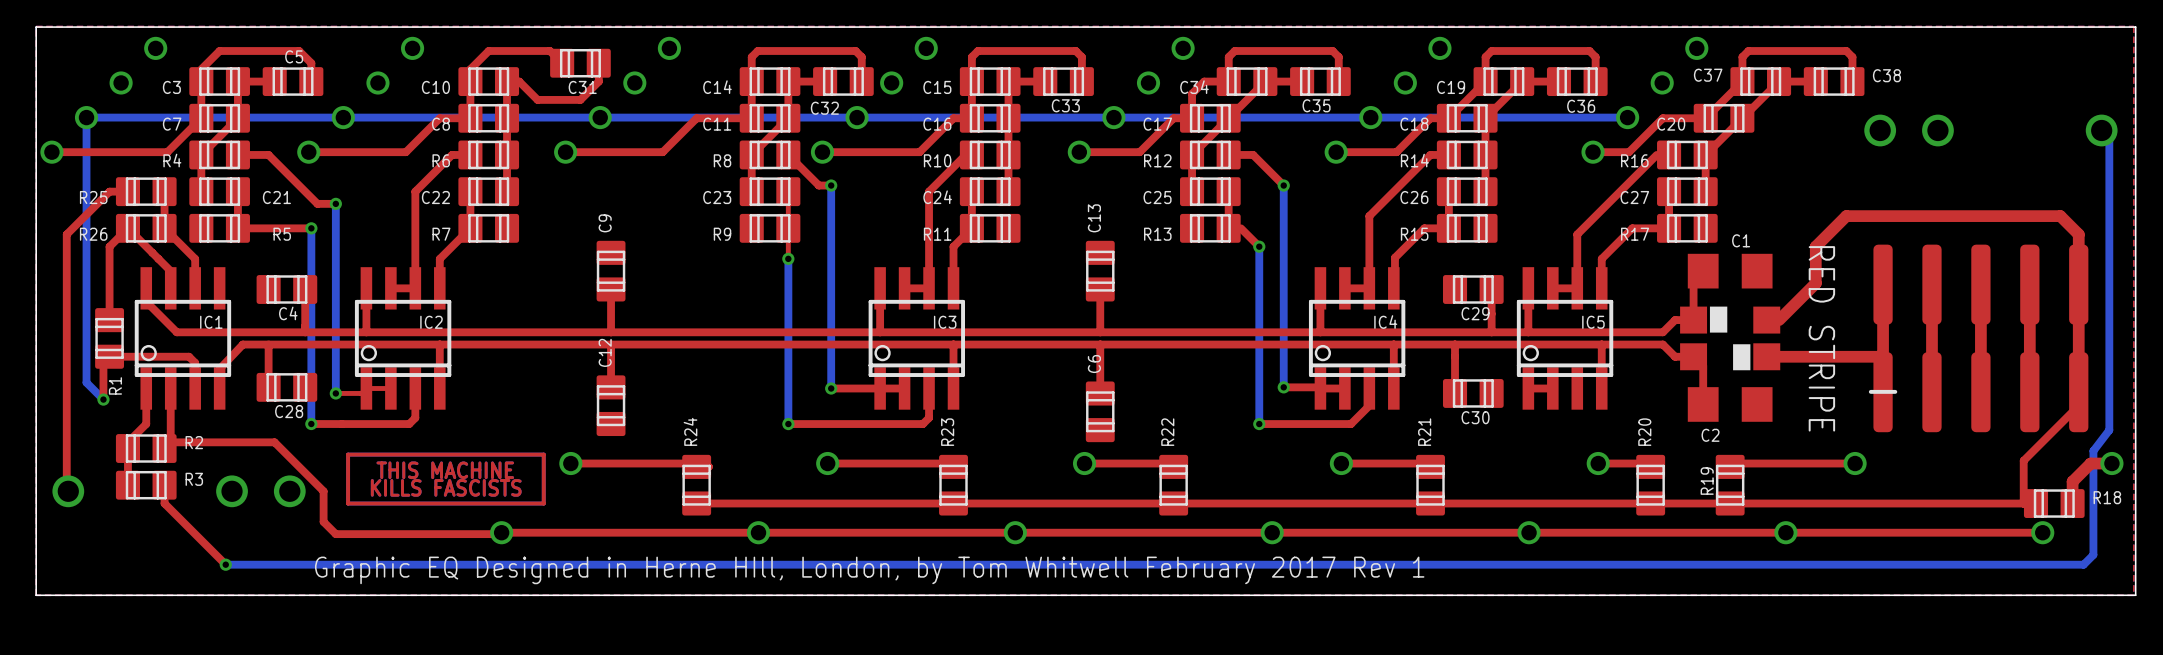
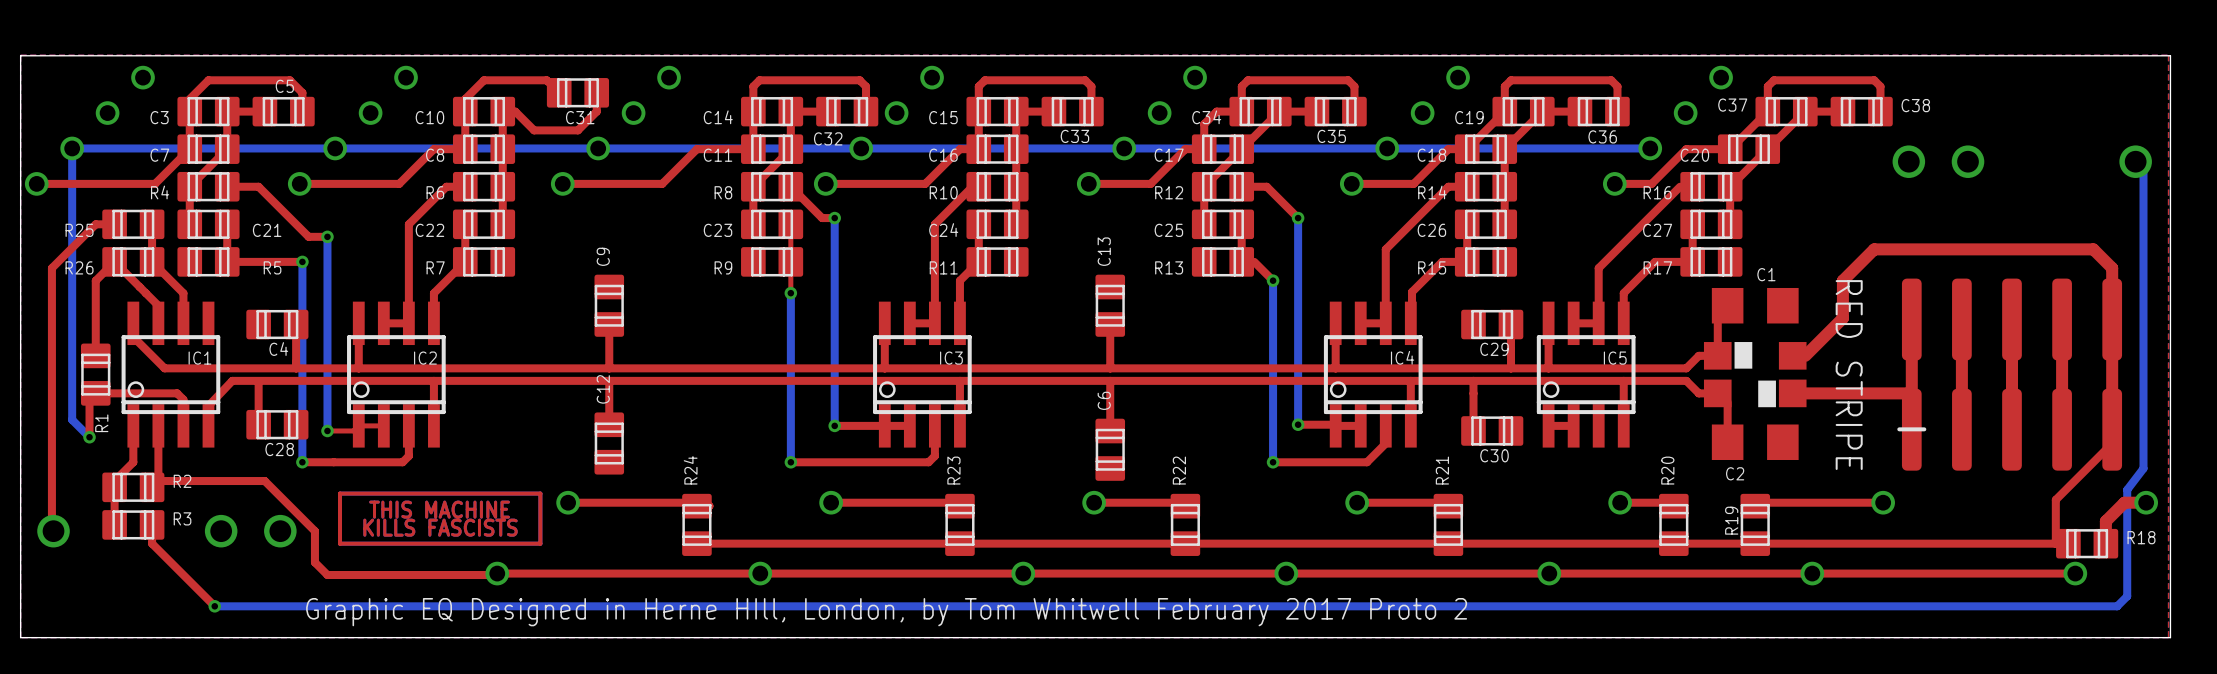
text: Graphic EQ Designed in Herne HIll, London, by Tom Whitwell February 2017 Rev 1 (869, 570) -> Graphic EQ Designed in Herne HIll, London, by Tom Whitwell February 2017 Proto 2 (886, 612)

